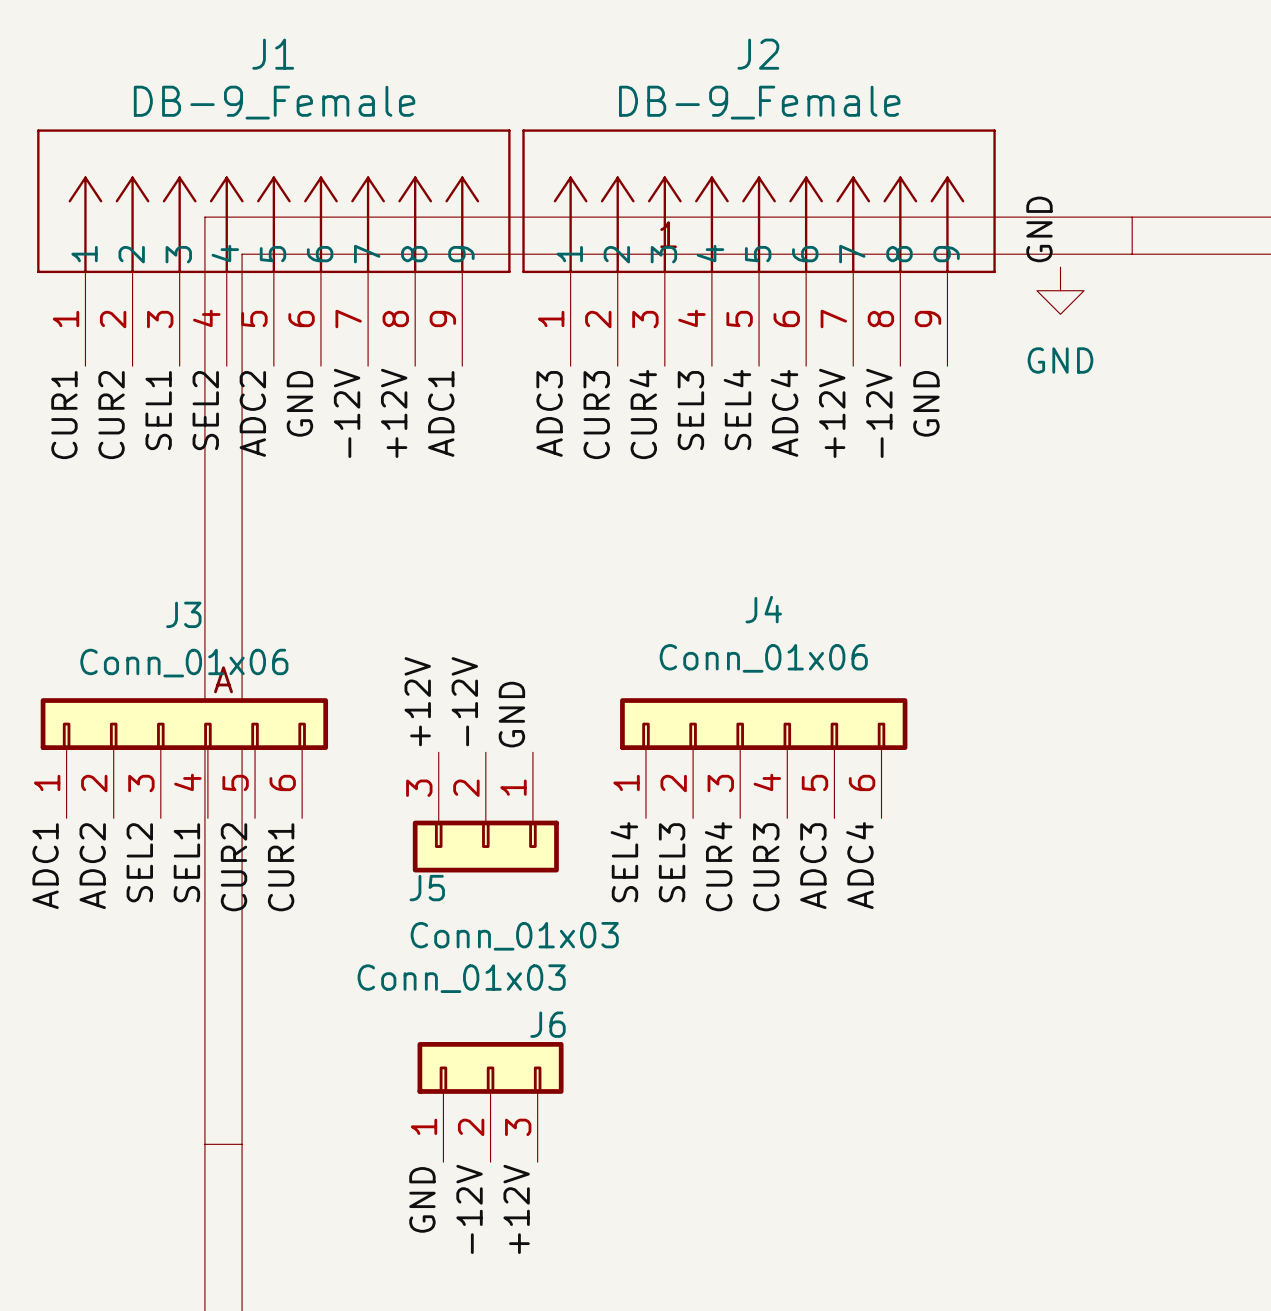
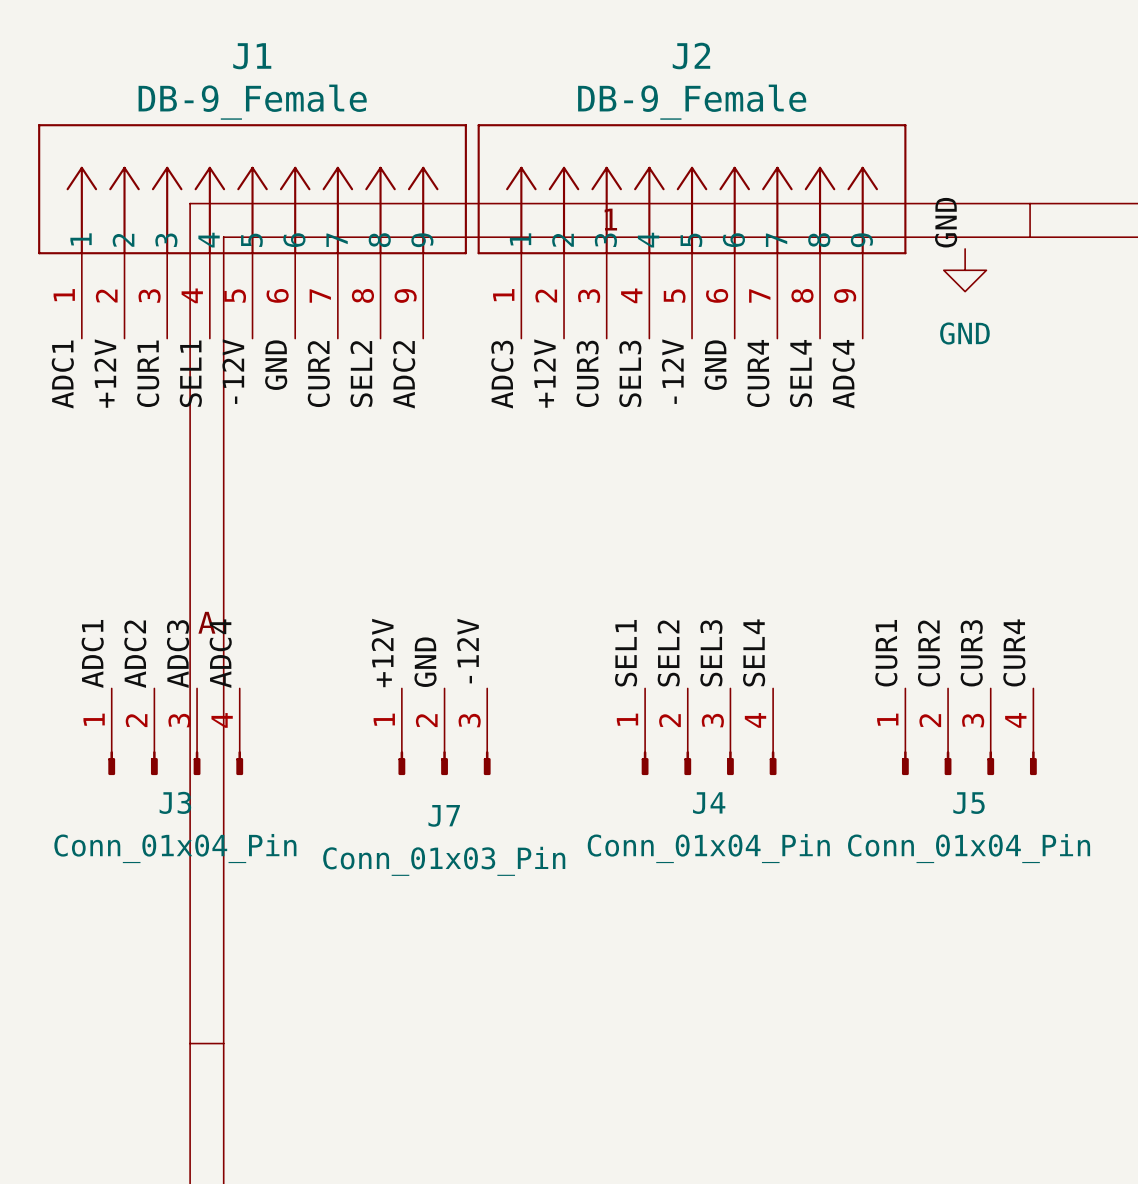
label: GND (926, 403) -> ADC4 (843, 374)
label: SEL1 (158, 410) -> CUR1 (148, 373)
label: SEL2 (205, 410) -> SEL1 (190, 373)
label: SEL4 (737, 410) -> -12V (672, 371)
label: ADC2 (252, 413) -> -12V (233, 371)
label: -12V (347, 413) -> CUR2 (318, 374)
label: +12V (394, 413) -> SEL2 (361, 374)
label: ADC1 (441, 413) -> ADC2 (404, 374)
label: ADC4 (784, 413) -> GND (715, 365)
label: +12V (832, 413) -> CUR4 (758, 373)
label: -12V (879, 413) -> SEL4 (801, 373)
label: CUR4 (643, 414) -> CUR3 (587, 373)
label: CUR1 (64, 415) -> ADC1 (62, 374)
label: CUR2 (111, 415) -> +12V (105, 373)
label: CUR3 (596, 415) -> +12V (544, 373)
J4 name position: J4 (763, 609) -> J4 (709, 803)
J3 name position: J3 (183, 614) -> J3 (175, 802)
J4 value: Conn_01x06 (763, 658) -> Conn_01x04_Pin (708, 848)
J3 value: Conn_01x06 (184, 663) -> Conn_01x04_Pin (175, 848)
J3 symbol: [40, 698, 329, 819] -> [108, 688, 244, 776]
J4 symbol: [620, 698, 908, 819] -> [641, 688, 777, 776]
label: -12V (464, 701) -> GND (425, 662)
label: none -> CUR1 (886, 653)
label: none -> CUR2 (929, 653)
label: none -> ADC3 (178, 654)
label: none -> ADC4 (220, 653)
label: none -> SEL1 (626, 653)
label: none -> SEL2 (668, 653)
label: GND (511, 714) -> -12V (467, 651)
J5 symbol: [412, 752, 559, 873] -> [901, 688, 1037, 776]
J7: none -> Conn_01x03_Pin (444, 731)
label: SEL2 (139, 862) -> none
label: SEL1 (186, 862) -> none
label position: SEL4 (624, 862) -> SEL4 (754, 652)
label position: SEL3 (672, 862) -> SEL3 (711, 653)
label: ADC4 (859, 865) -> none
label position: ADC1 (45, 866) -> ADC1 (92, 653)
label position: ADC2 (92, 866) -> ADC2 (135, 654)
label position: CUR4 (718, 866) -> CUR4 (1014, 652)
label: ADC3 (813, 866) -> none
label: CUR2 (234, 867) -> none
label: CUR1 (281, 867) -> none
label position: CUR3 (766, 867) -> CUR3 (971, 653)
J5 name position: J5 (427, 888) -> J5 (968, 803)
J5 value: Conn_01x03 (514, 936) -> Conn_01x04_Pin (969, 848)
J6: Conn_01x03 (490, 1102) -> none
label: GND (422, 1199) -> none
label: -12V (469, 1209) -> none
label: +12V (516, 1209) -> none

